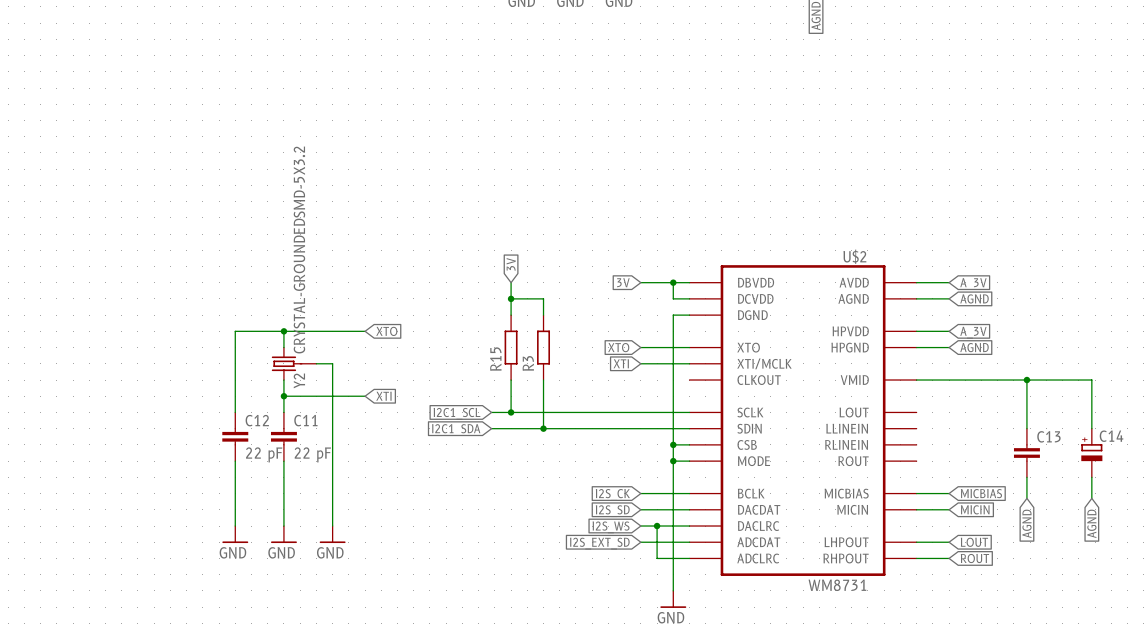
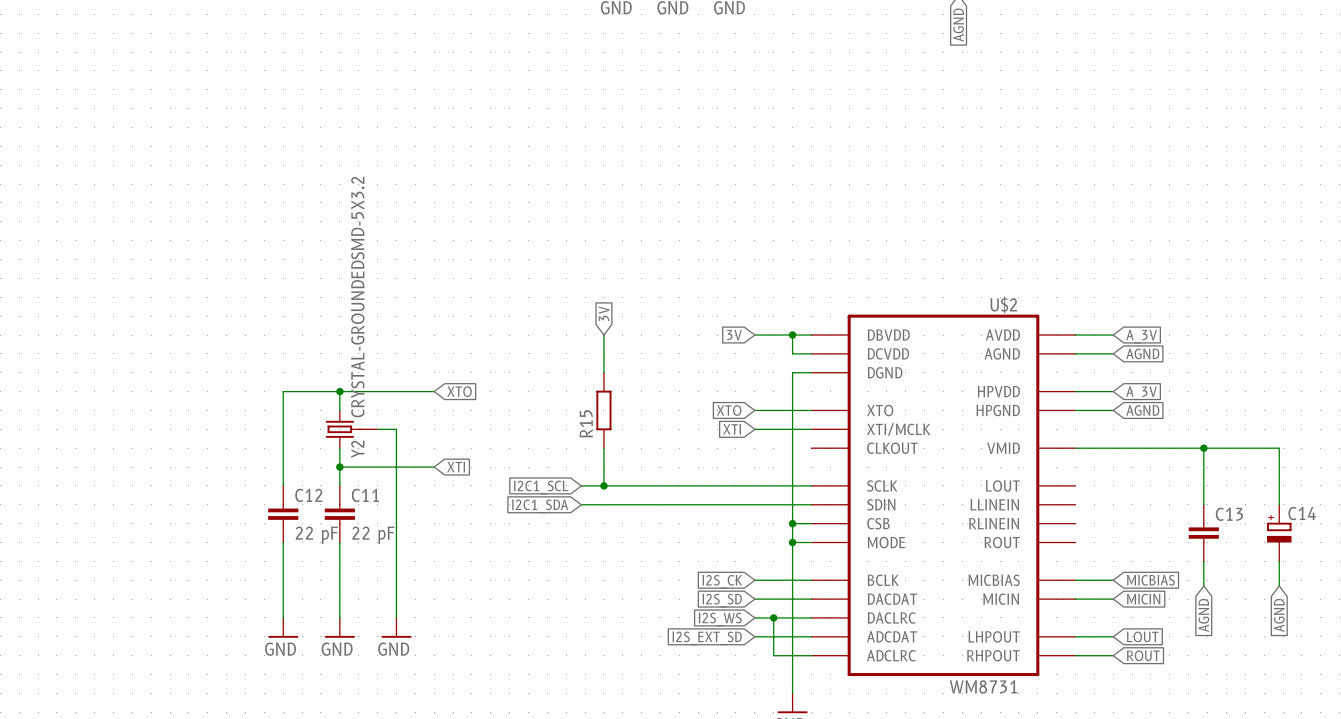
wire: (511, 298) (543, 298) (543, 315) -> none
junction: (511, 298) -> none
R3: (543, 347) -> none
wire: (543, 380) (543, 428) -> none
junction: (543, 428) -> none

